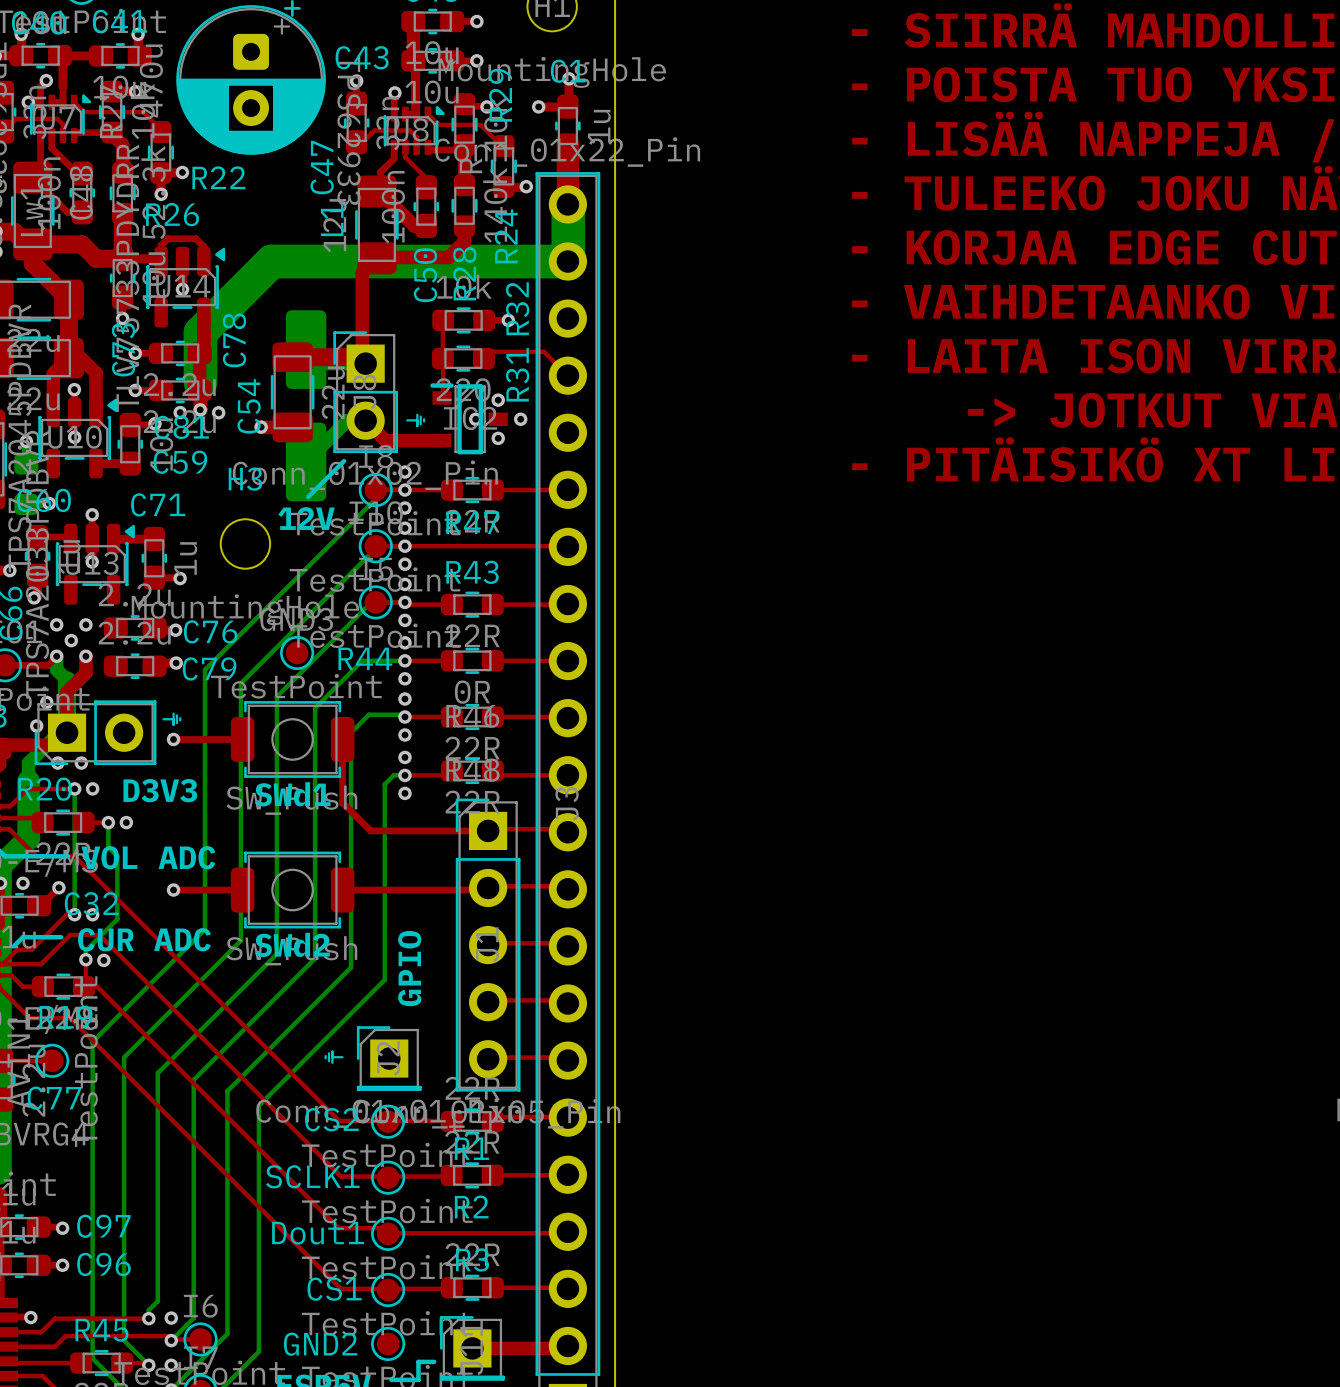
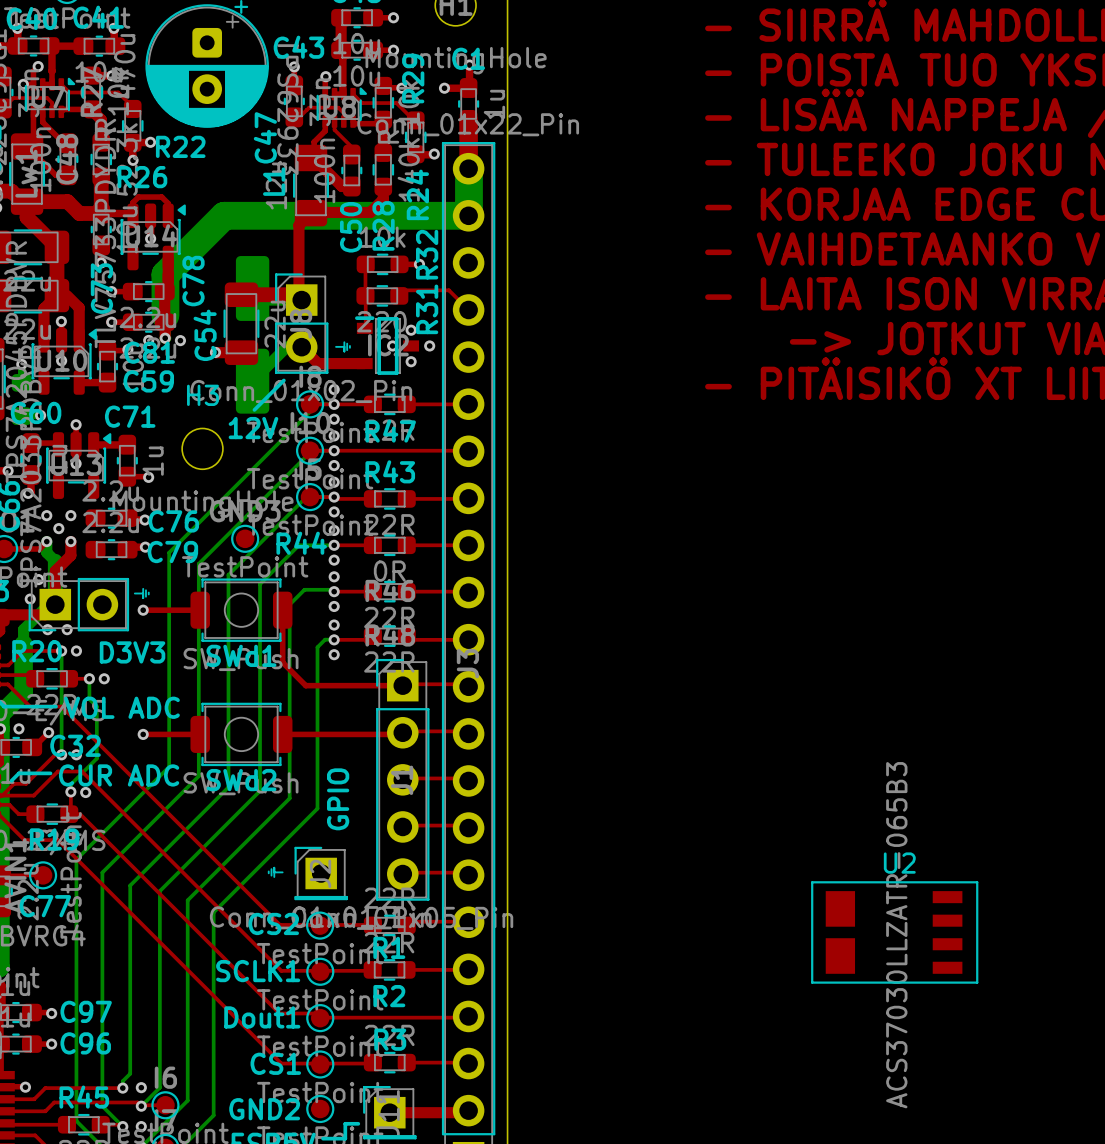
U2: none -> ACS37030LLZATR-065B3 (894, 932)

